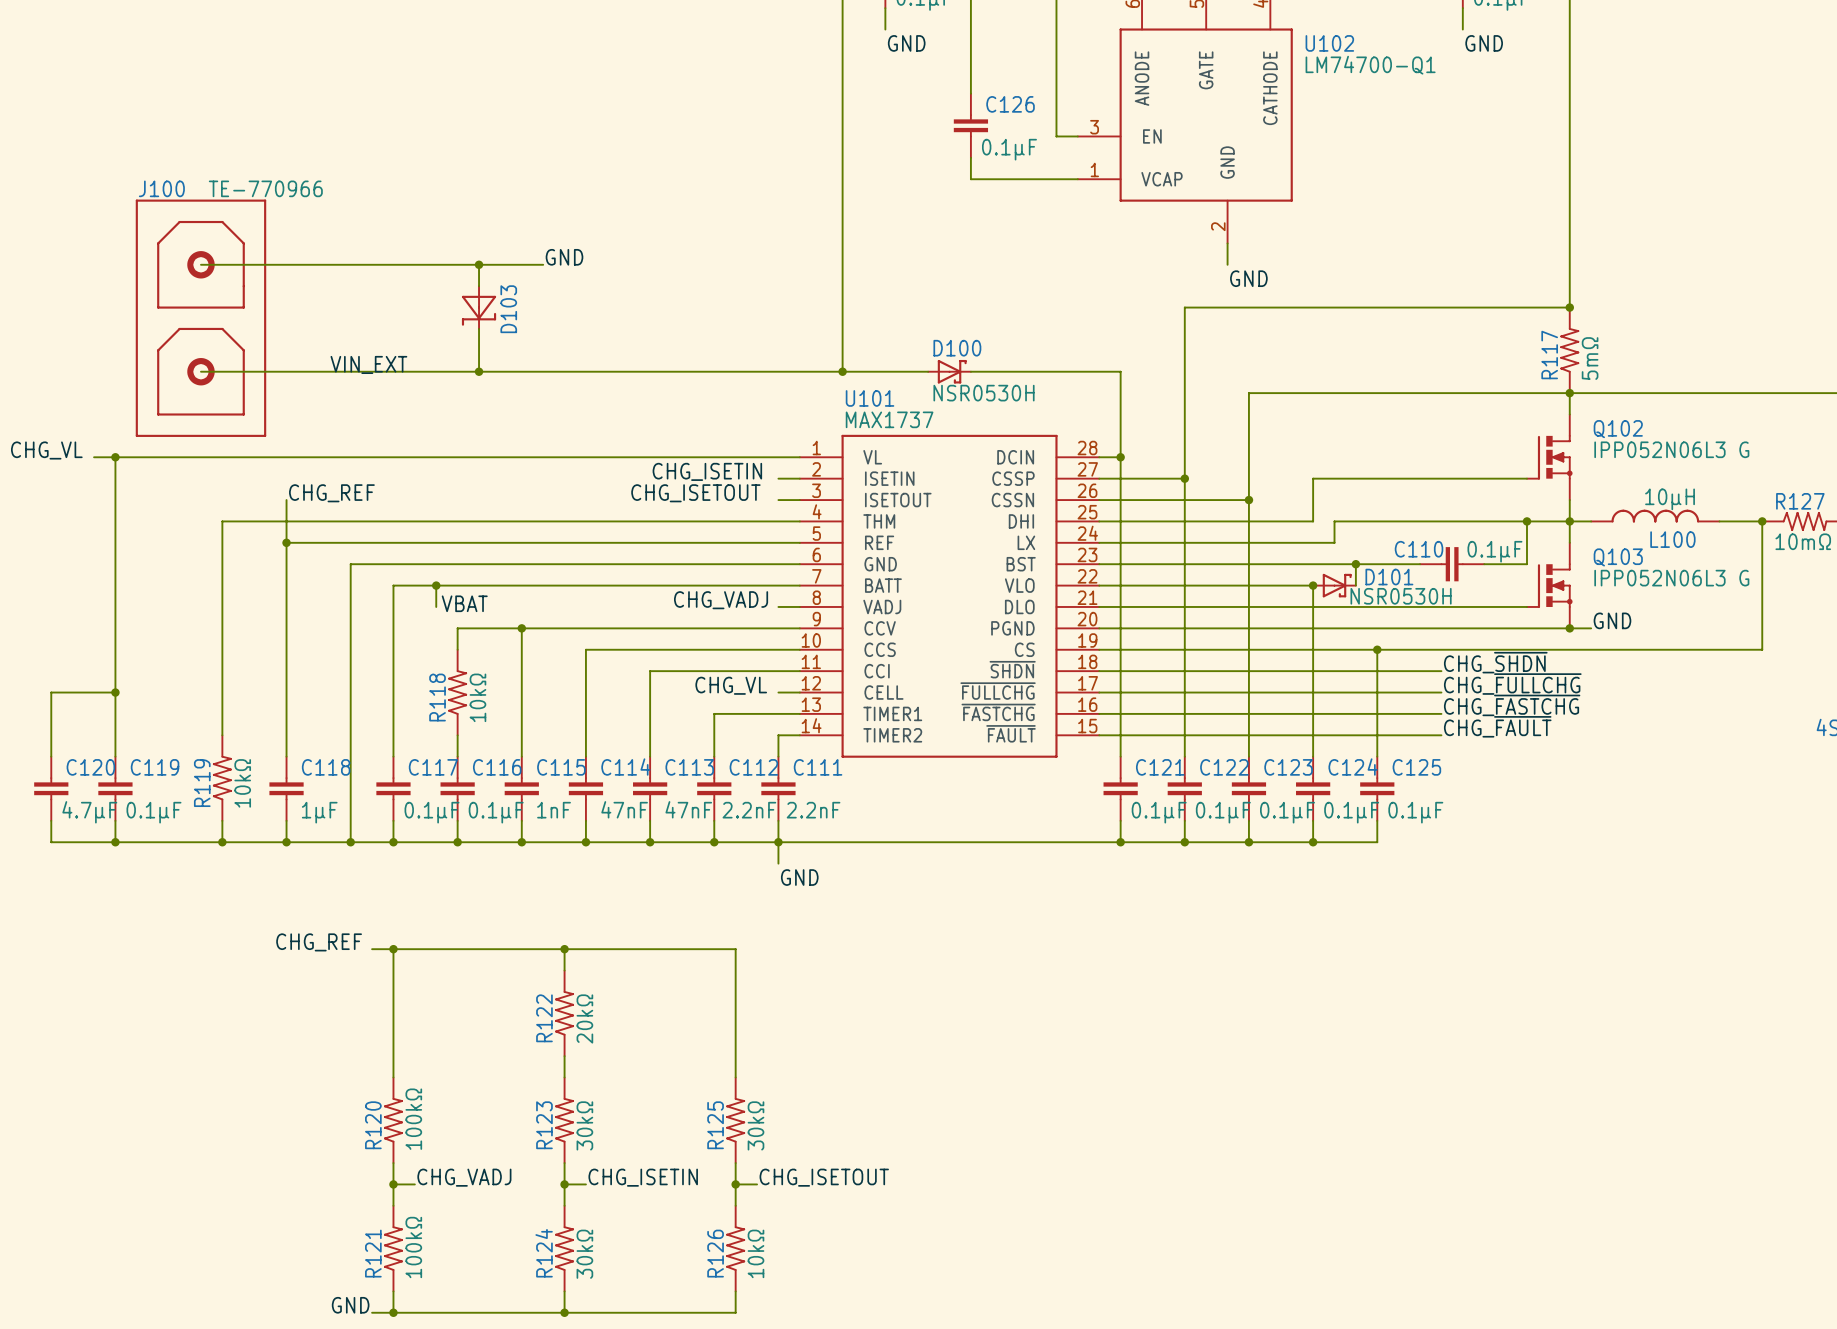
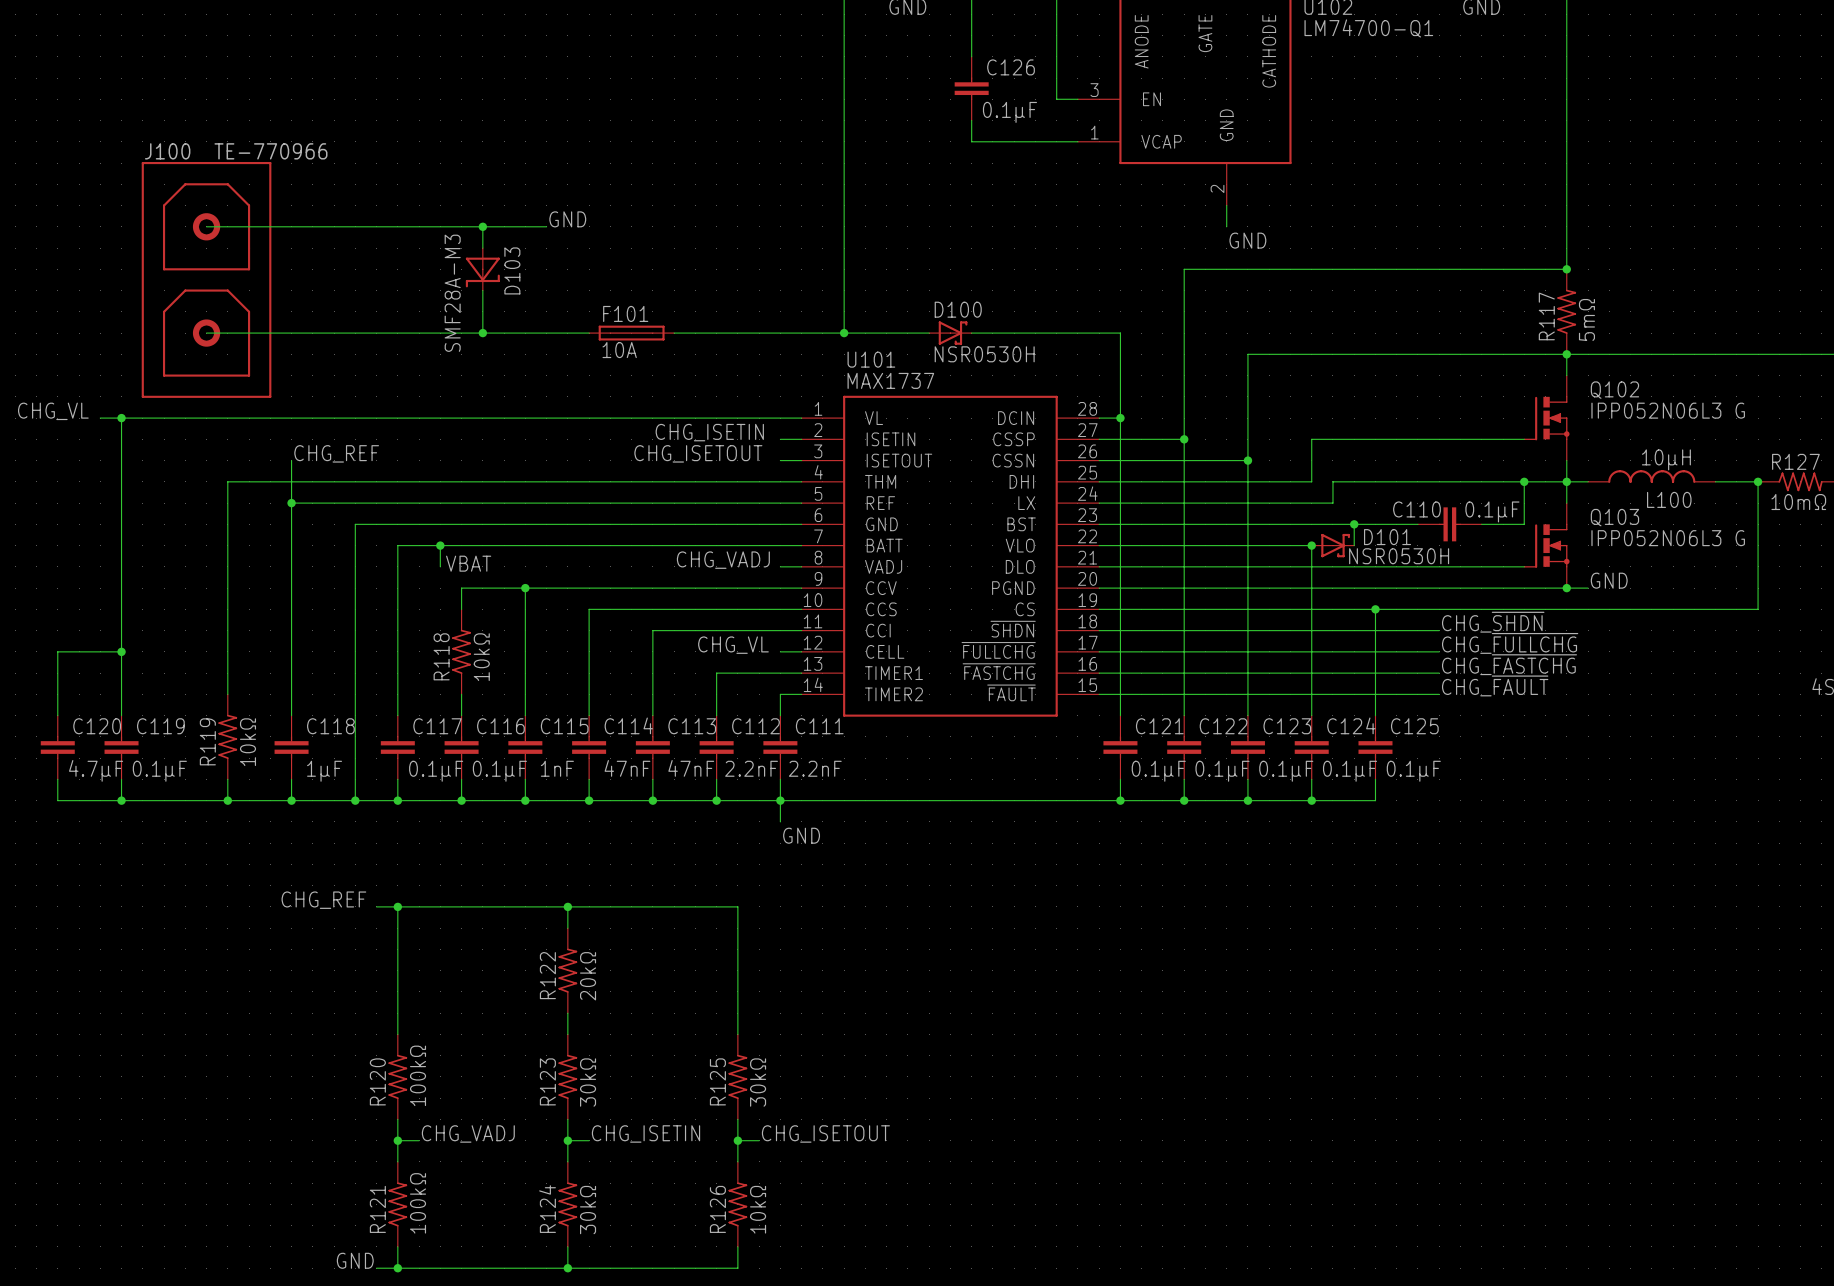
D103 value: none -> SMF28A-M3 (452, 293)
label: VIN_EXT (368, 364) -> none
F101: none -> 10A (631, 333)

